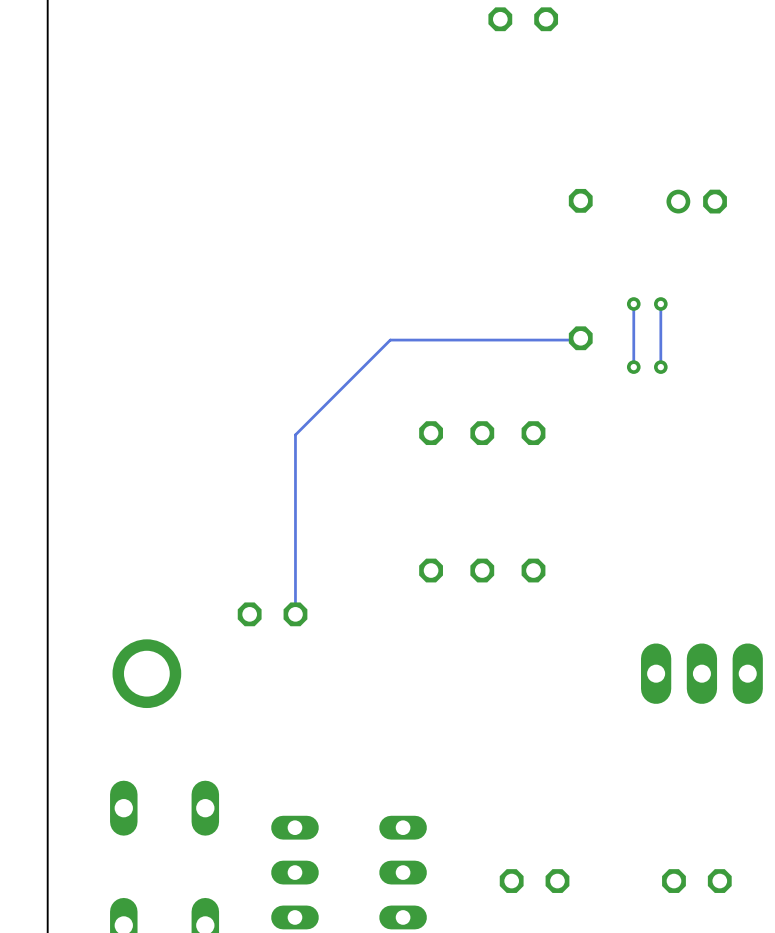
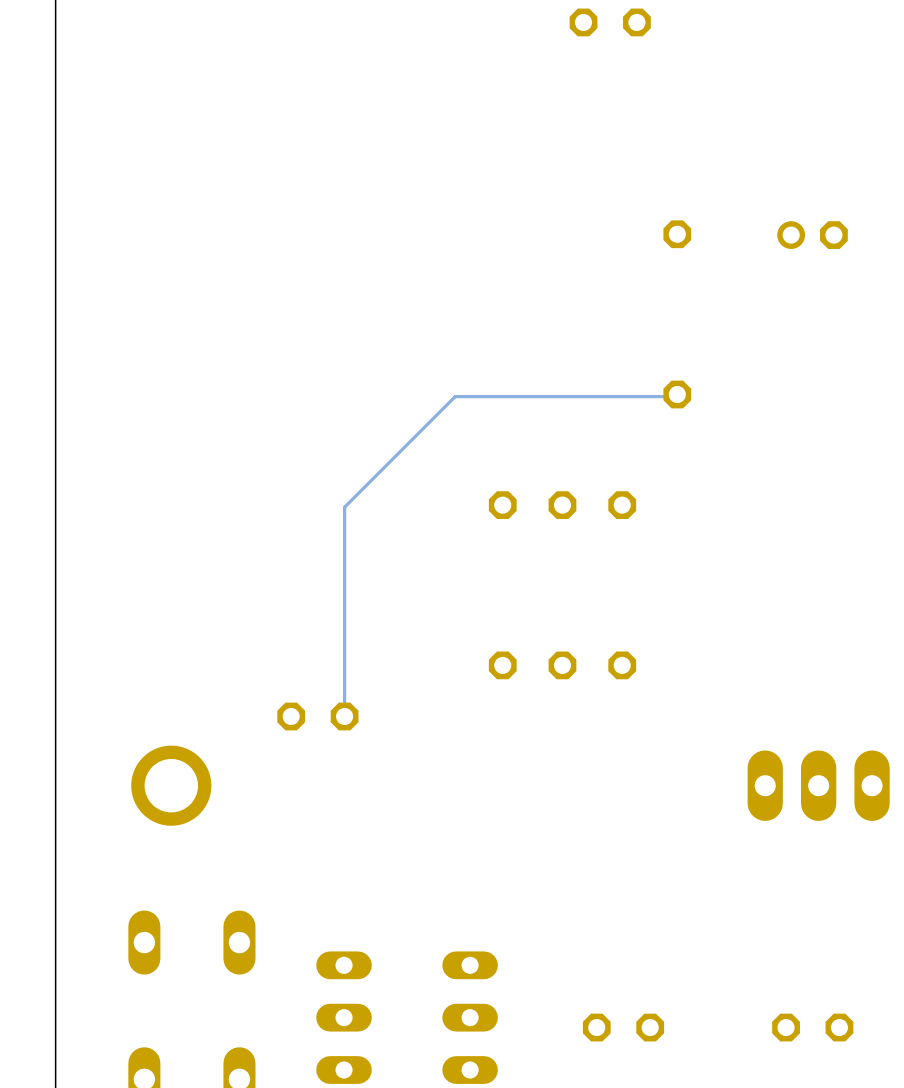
track: (633, 304) (633, 367) -> none
via: (633, 304) -> none
track: (660, 304) (660, 367) -> none
via: (660, 304) -> none
via: (633, 367) -> none
via: (660, 367) -> none

